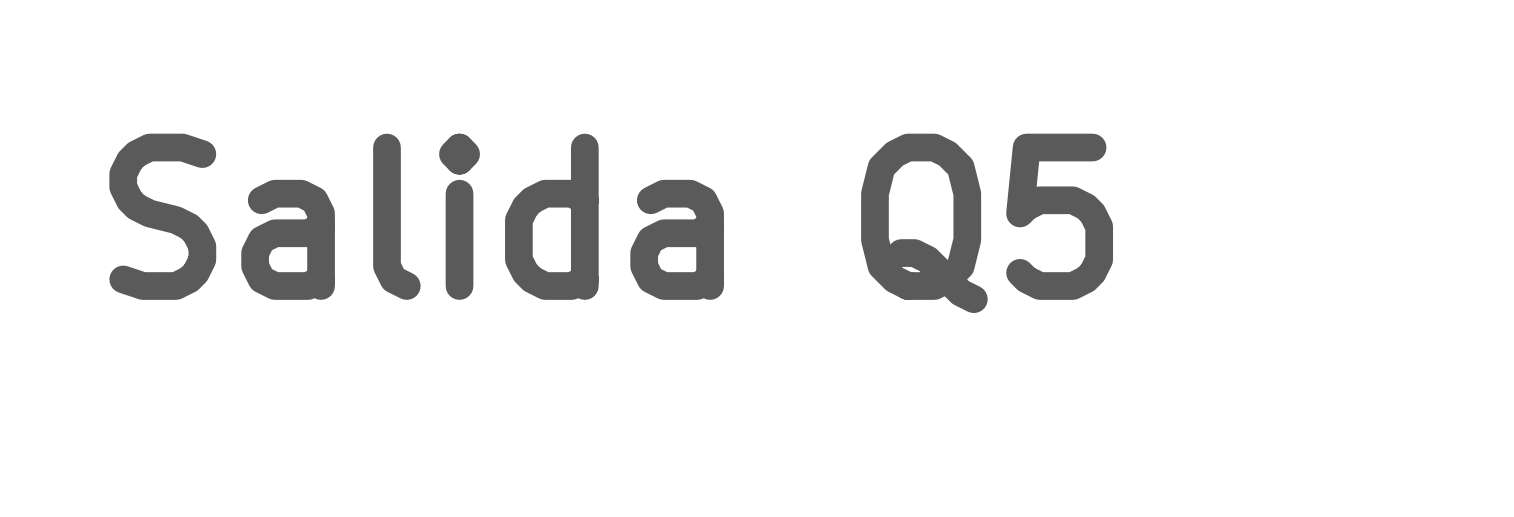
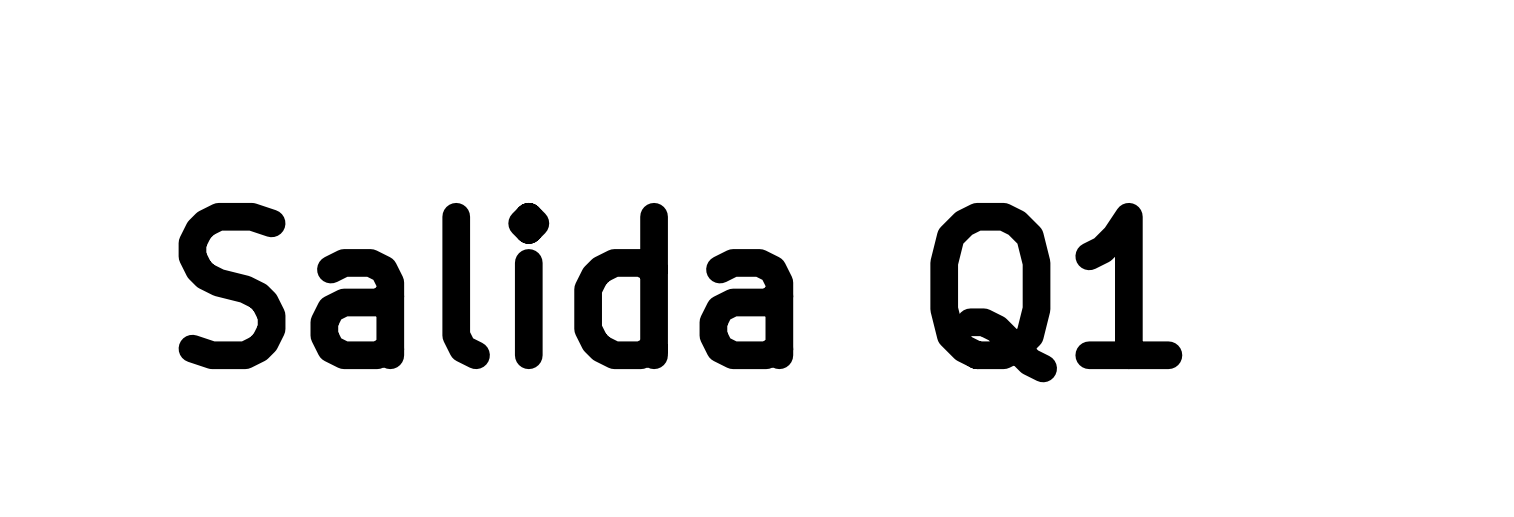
text: Salida Q5 (611, 223) -> Salida Q1 (680, 292)

